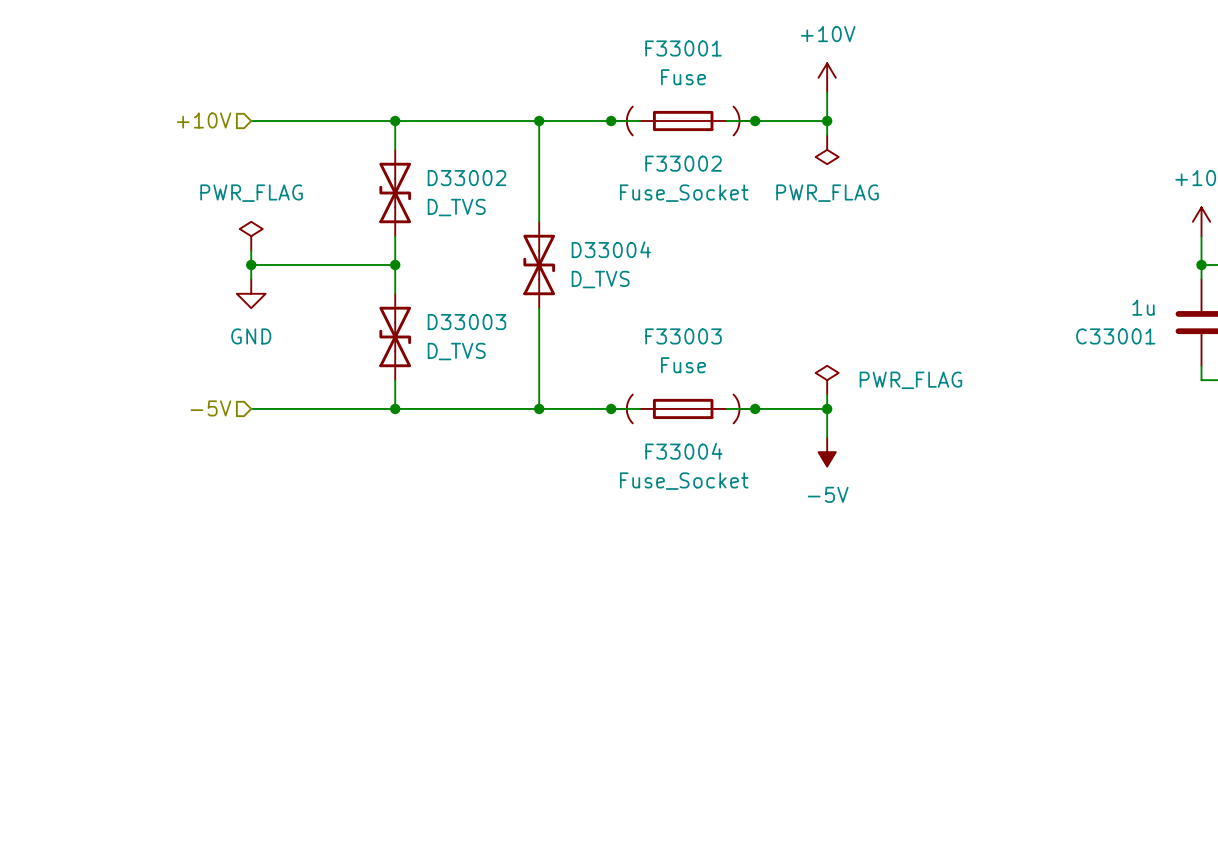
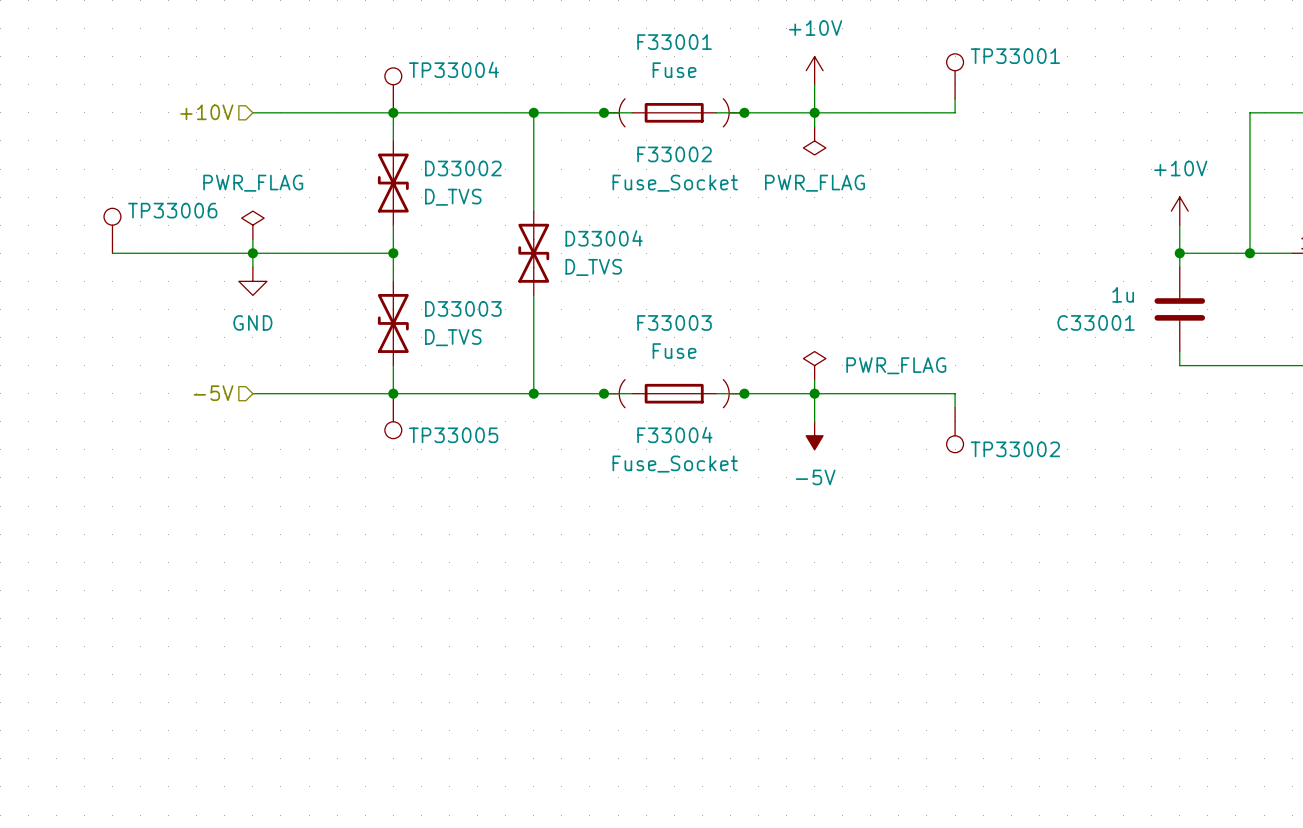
TP33001: none -> (955, 76)
TP33004: none -> (393, 90)
wire: none -> (955, 98) (955, 112) (814, 112)
TP33006: none -> (112, 230)
wire: none -> (112, 253) (252, 253)
wire: none -> (814, 393) (955, 393) (955, 407)
TP33005: none -> (393, 416)
TP33002: none -> (955, 430)

